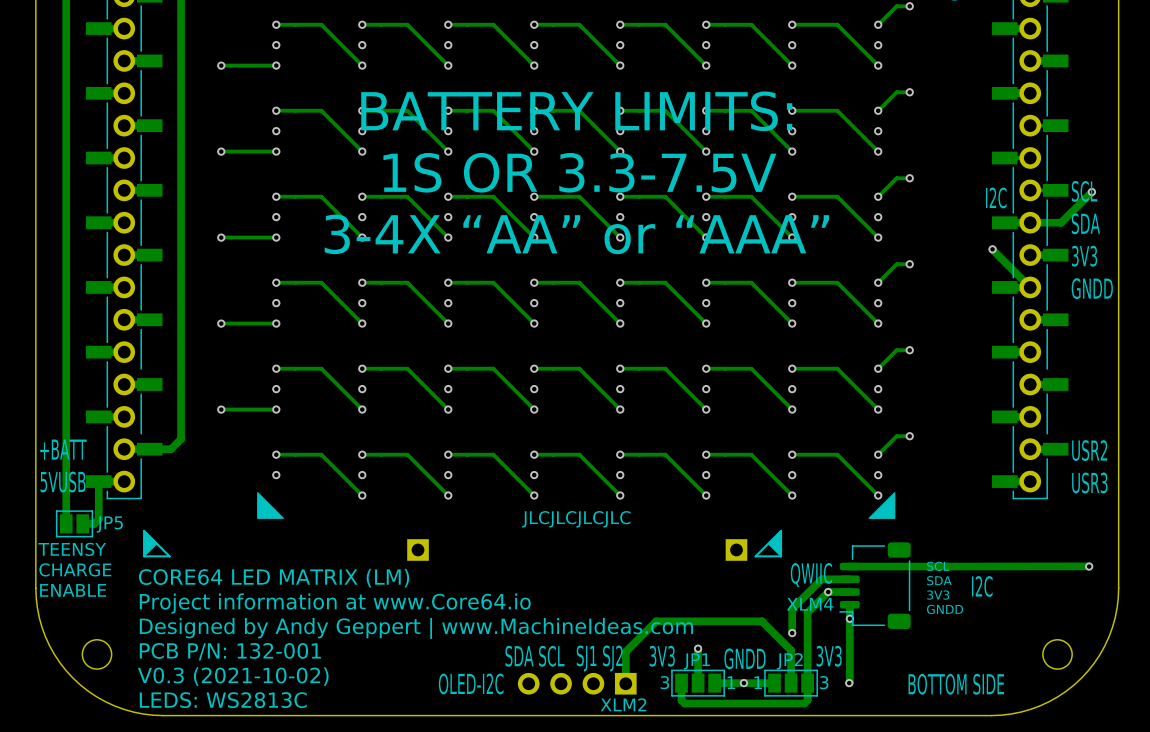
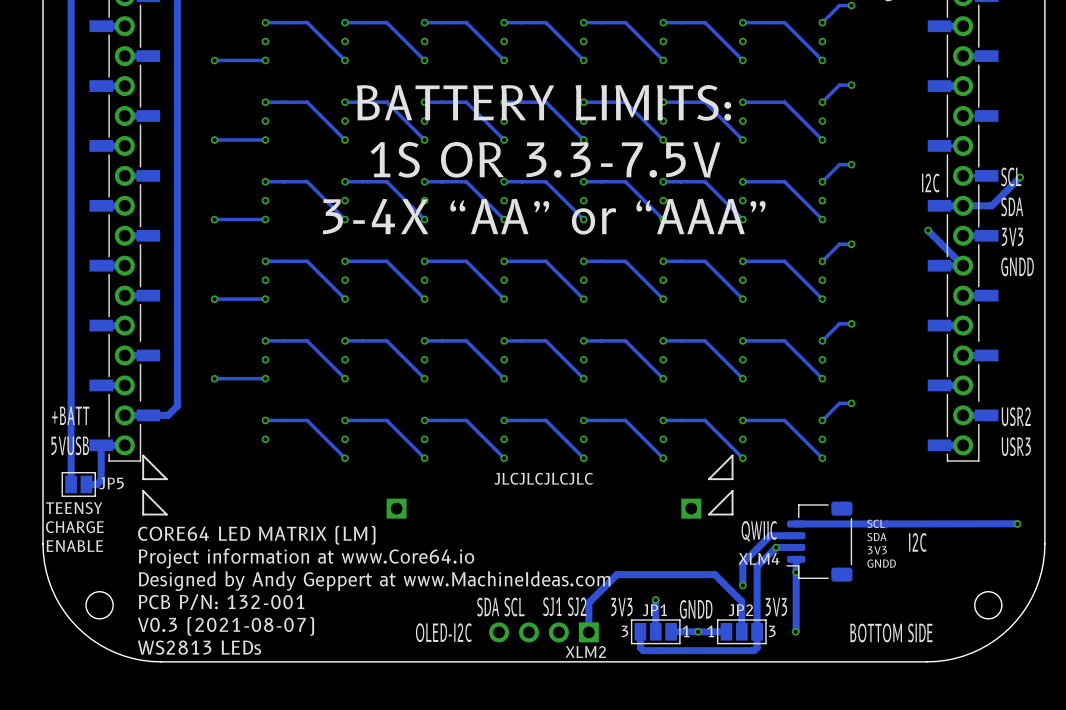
line: none -> (143, 455) (166, 479) (143, 479) (143, 455)
drawing: [257, 492, 284, 519] -> none
line: none -> (732, 455) (732, 479) (708, 479) (732, 455)
drawing: [868, 492, 896, 519] -> none
drawing: [143, 530, 158, 557] -> none
drawing: [767, 530, 782, 557] -> none
text: Designed by Andy Geppert | www.MachineIdeas.com (416, 628) -> Designed by Andy Geppert at www.MachineIdeas.com (374, 581)
text: V0.3 (2021-10-02) (233, 676) -> V0.3 (2021-08-07) (226, 626)
text: LEDS: WS2813C (223, 700) -> WS2813 LEDs (199, 647)

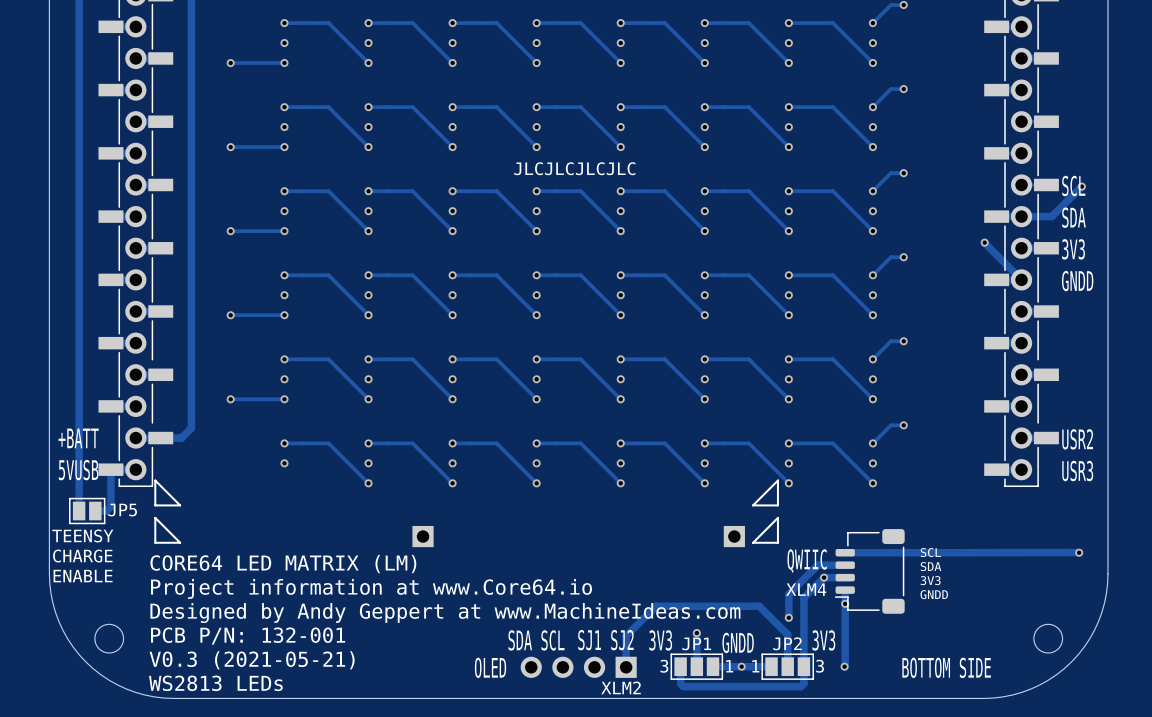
text: BATTERY LIMITS: (544, 102) -> none
text: 1S OR 3.3-7.5V (545, 159) -> none
text: none -> JLCJLCJLCJLC (574, 168)
text: I2C (930, 183) -> none
text: 3-4X “AA” or “AAA” (544, 216) -> none
text: JLCJLCJLCJLC (543, 478) -> none
text: I2C (917, 542) -> none
text: V0.3 (2021-08-07) (226, 626) -> V0.3 (2021-05-21) (252, 660)
text: OLED-I2C (443, 632) -> OLED (490, 667)

